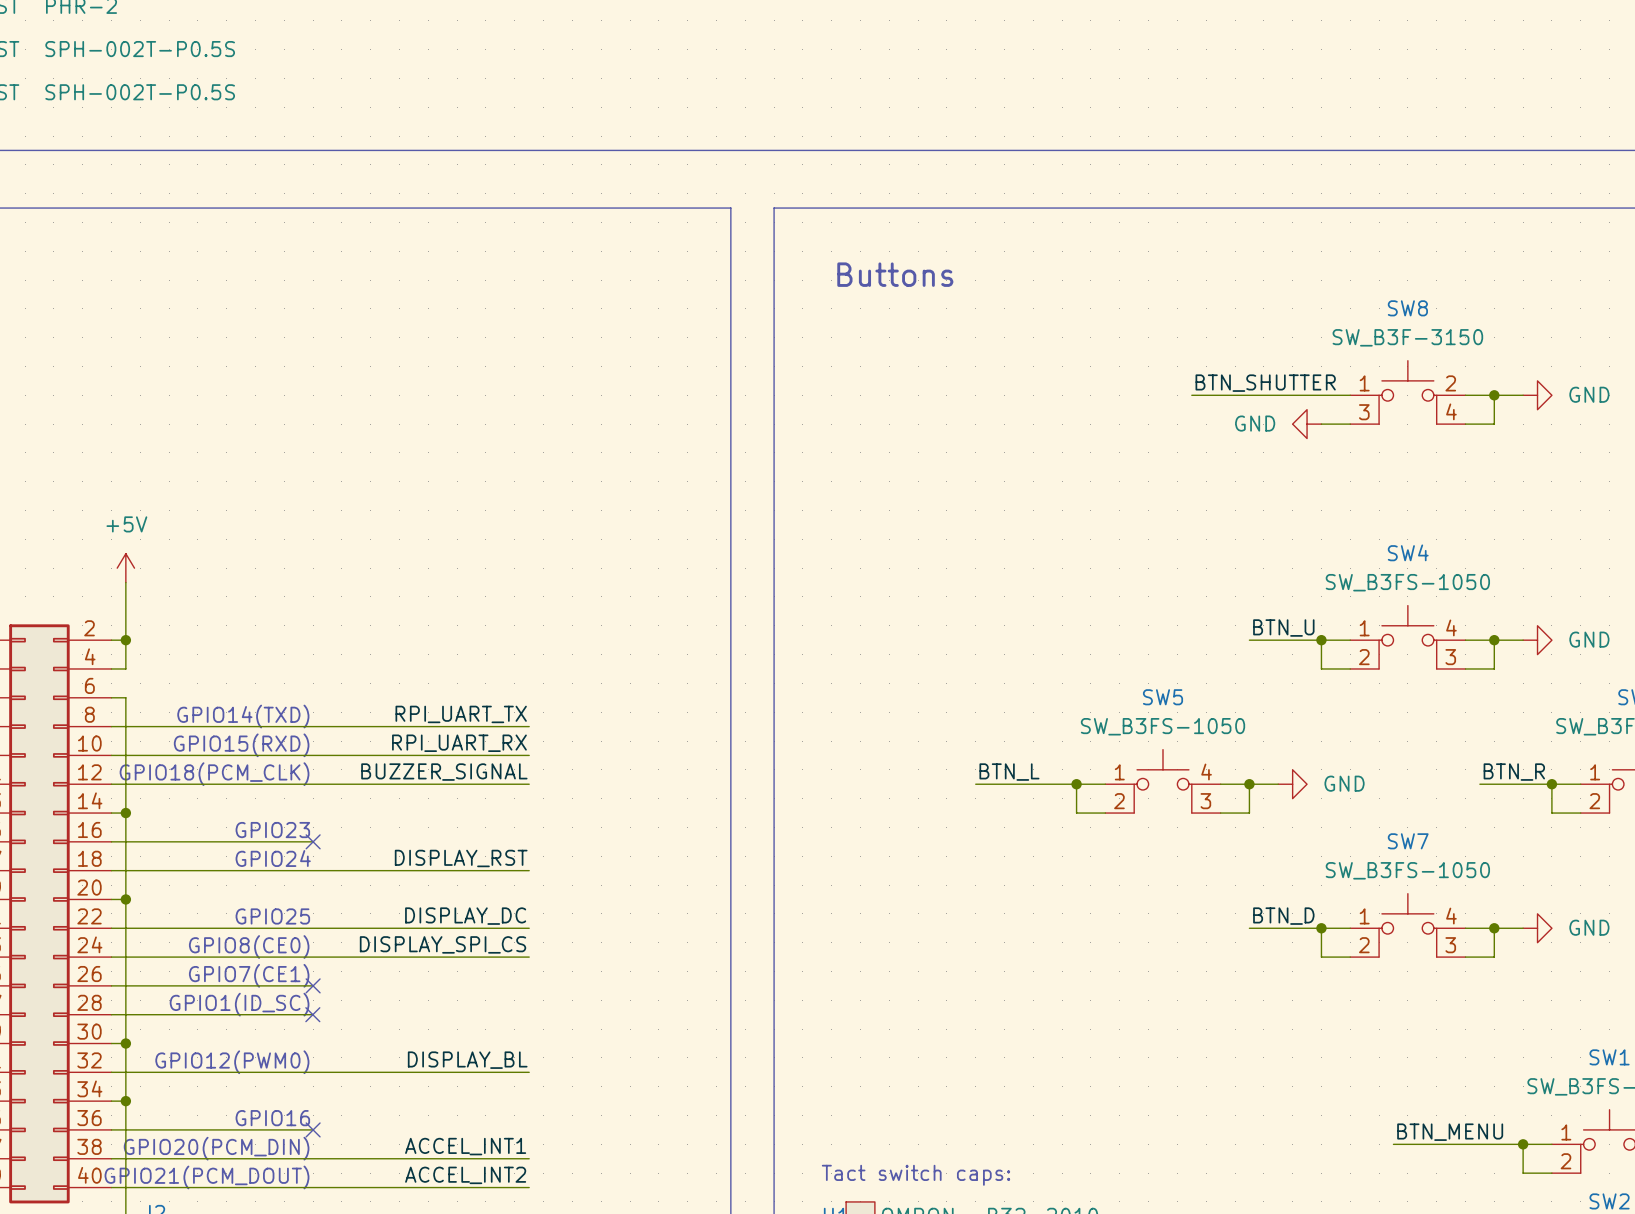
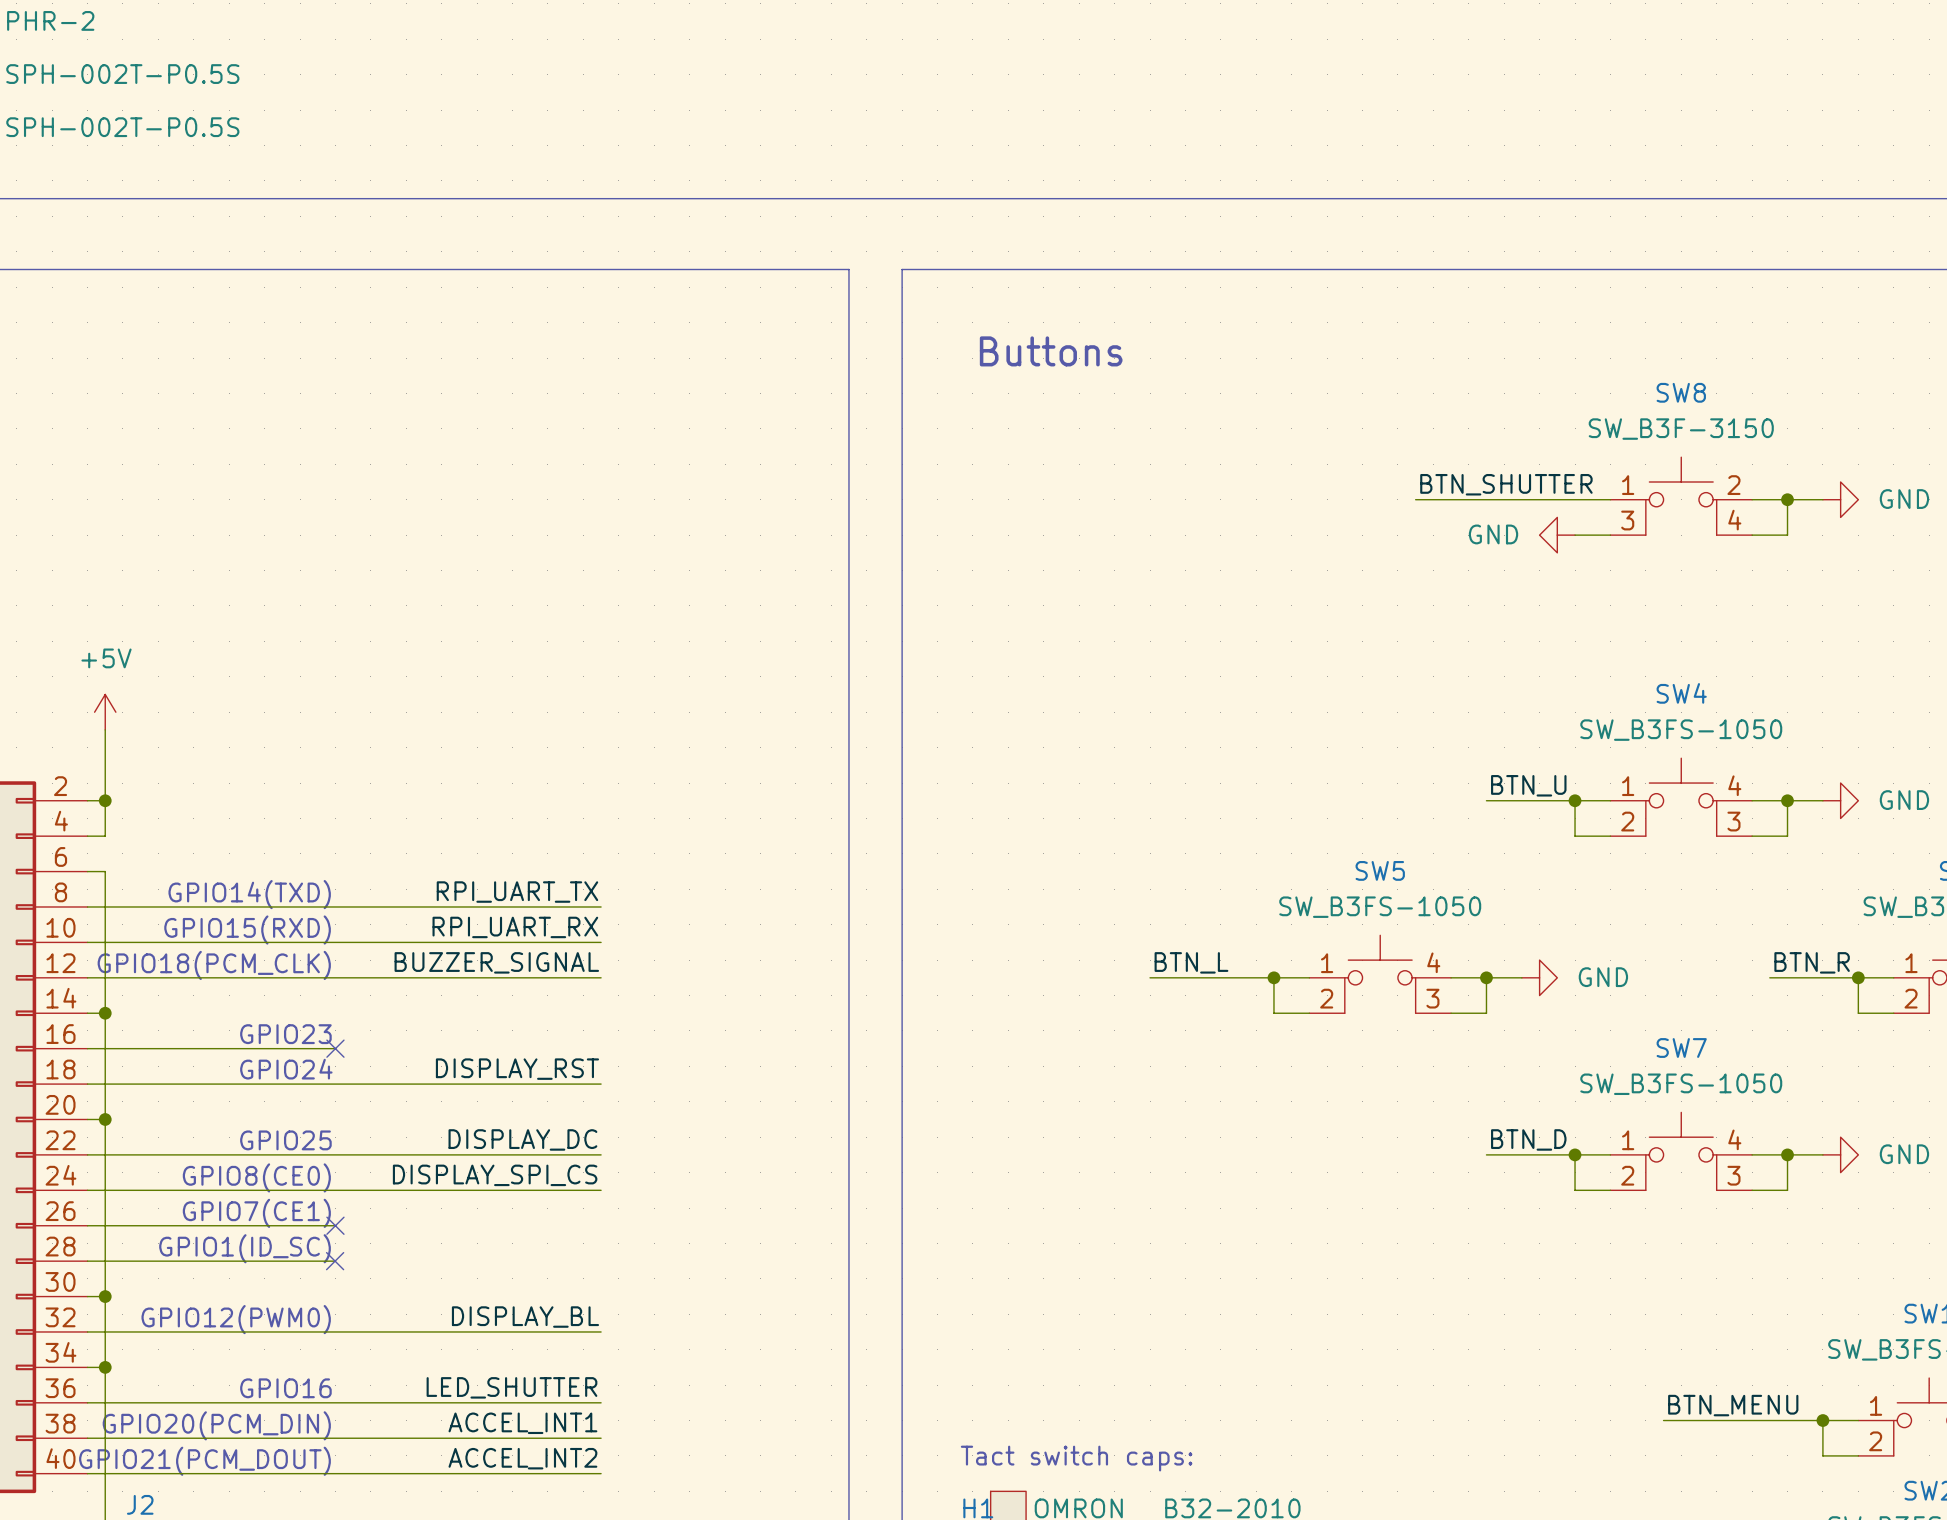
label: none -> LED_SHUTTER (511, 1387)
wire: none -> (335, 1402) (601, 1402)
no-connect mark: (313, 1129) -> none

